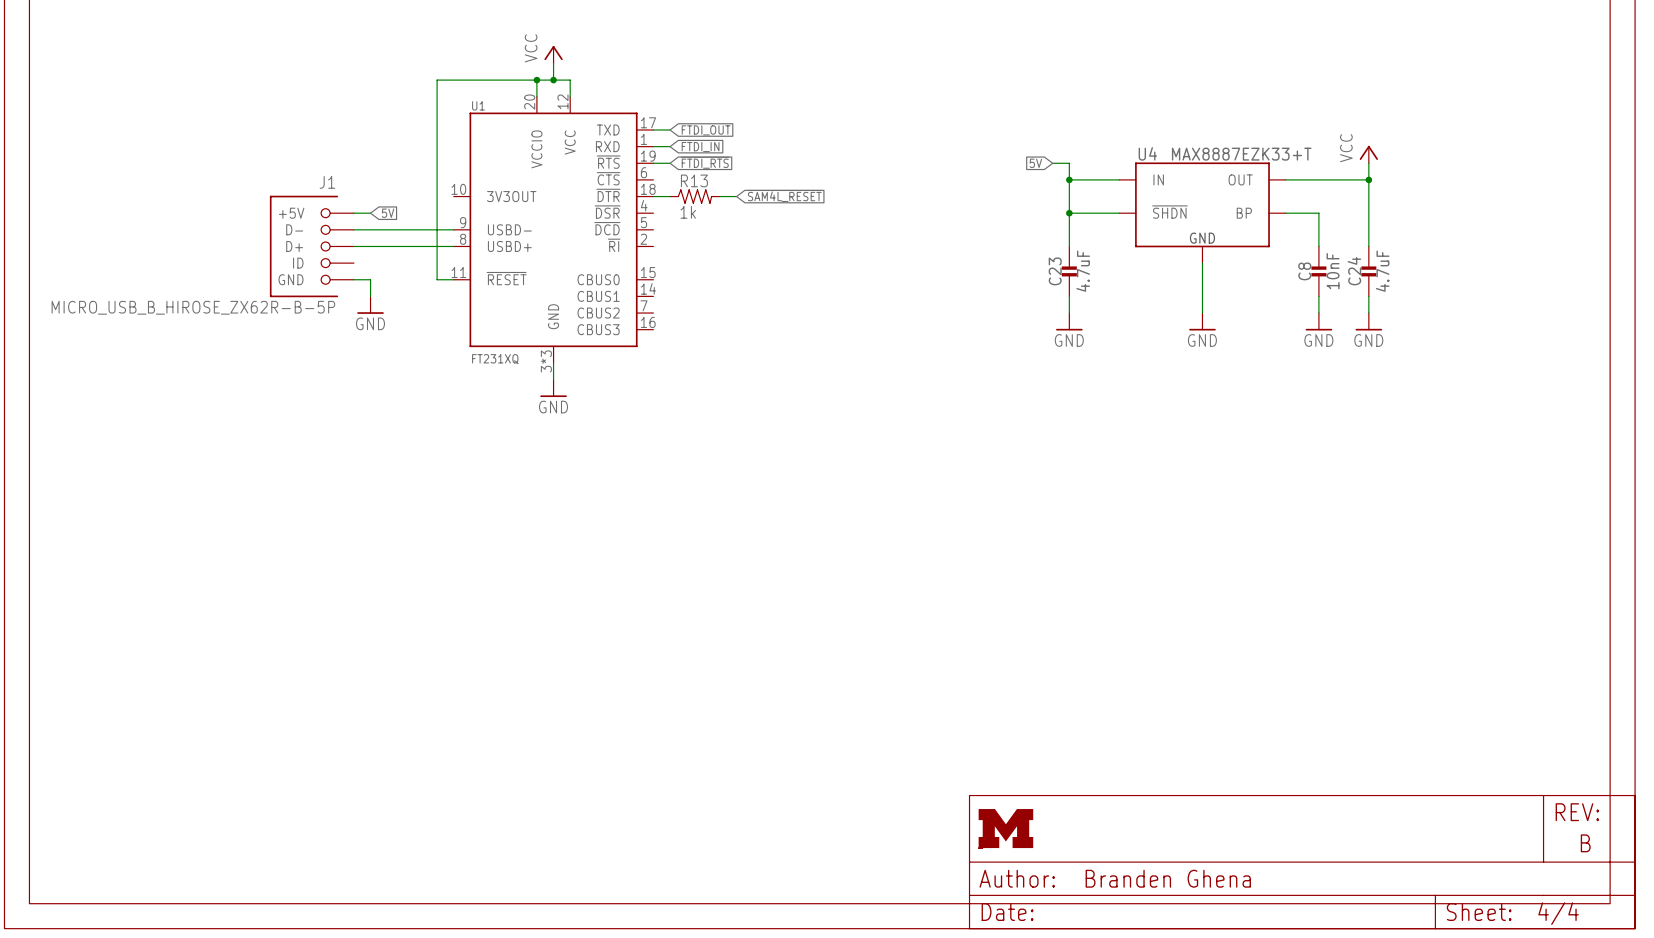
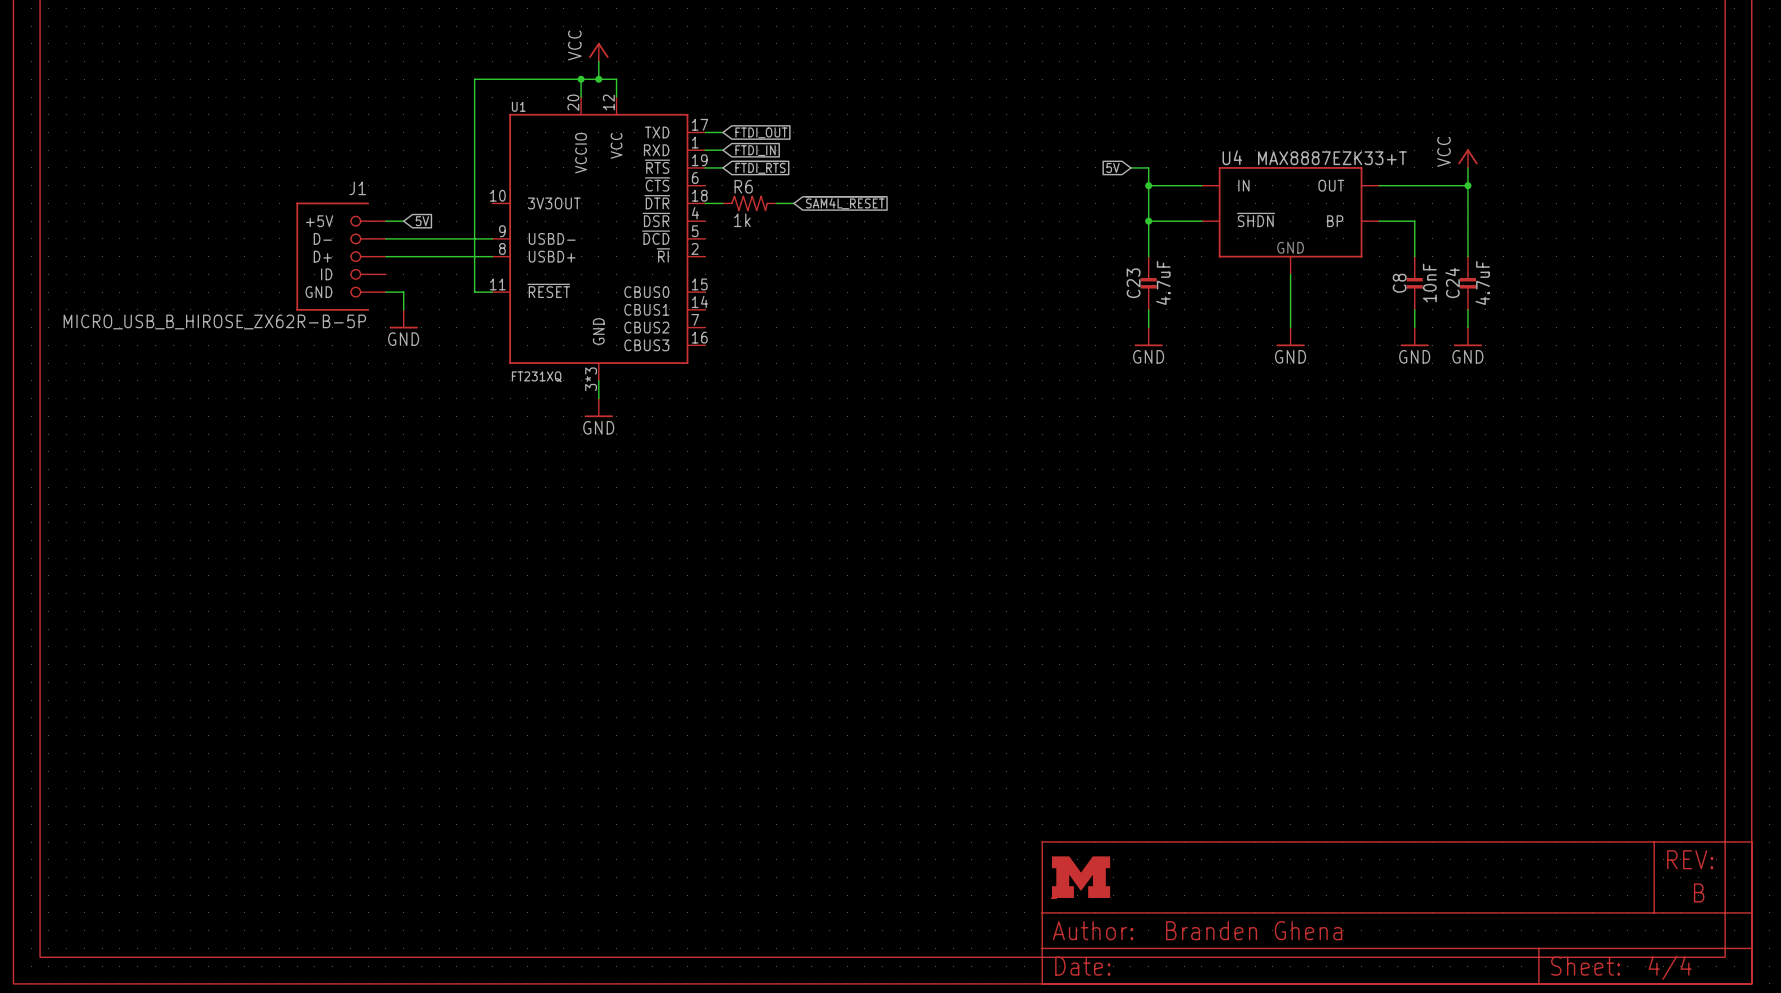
R13 name: R13 (694, 180) -> R6 (743, 186)

